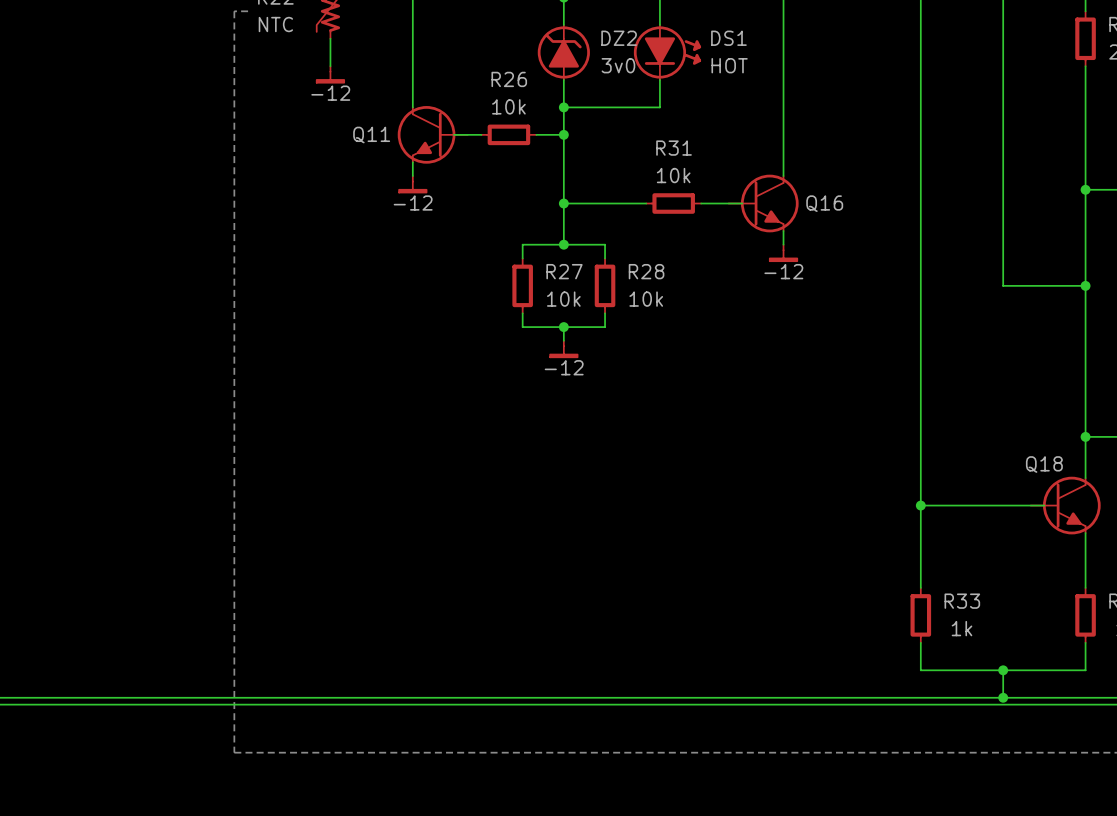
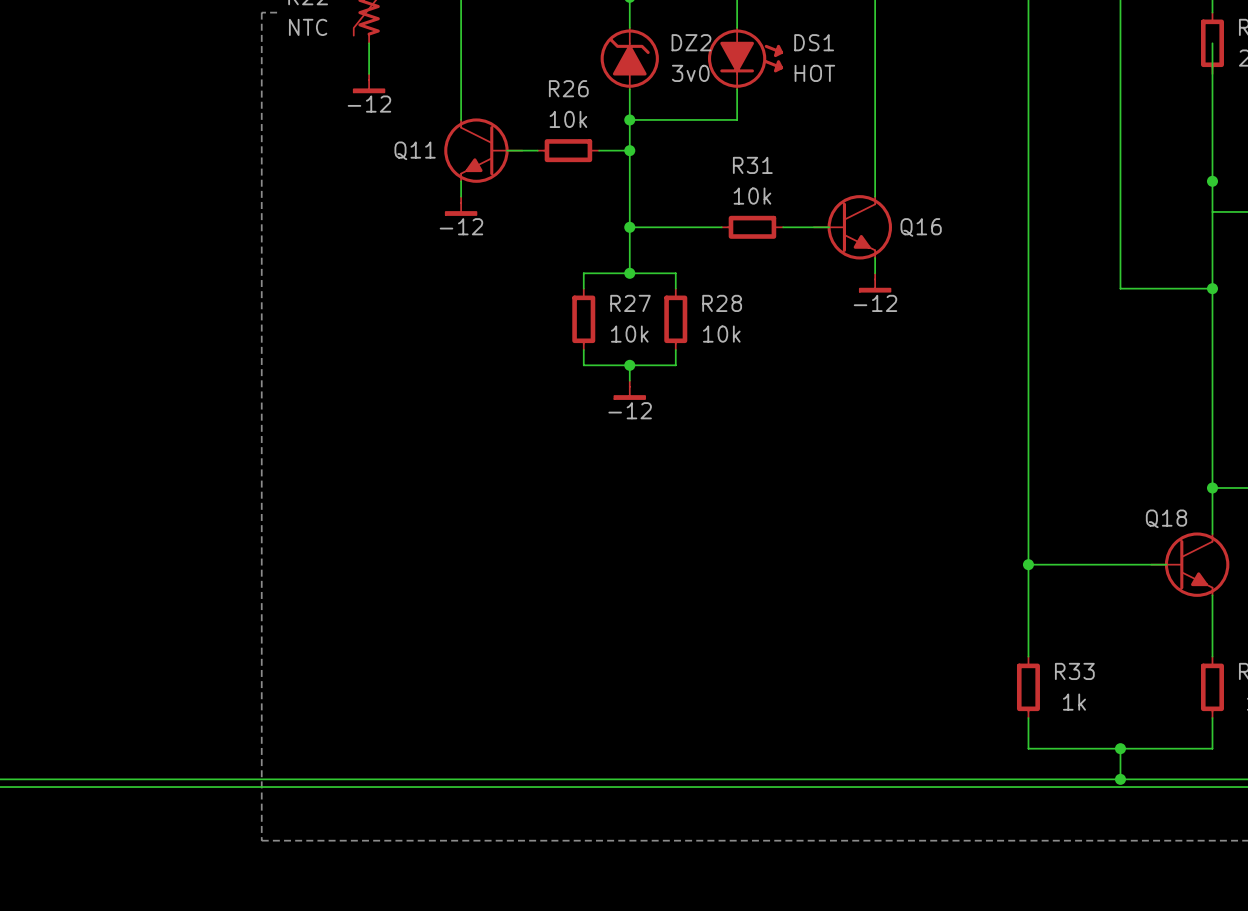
wire: none -> (1212, 43) (1212, 73)
junction position: (1085, 189) -> (1212, 181)
wire: (1003, 258) (1003, 285) (1085, 285) -> (1120, 288) (1212, 288)
junction position: (1085, 285) -> (1212, 288)

